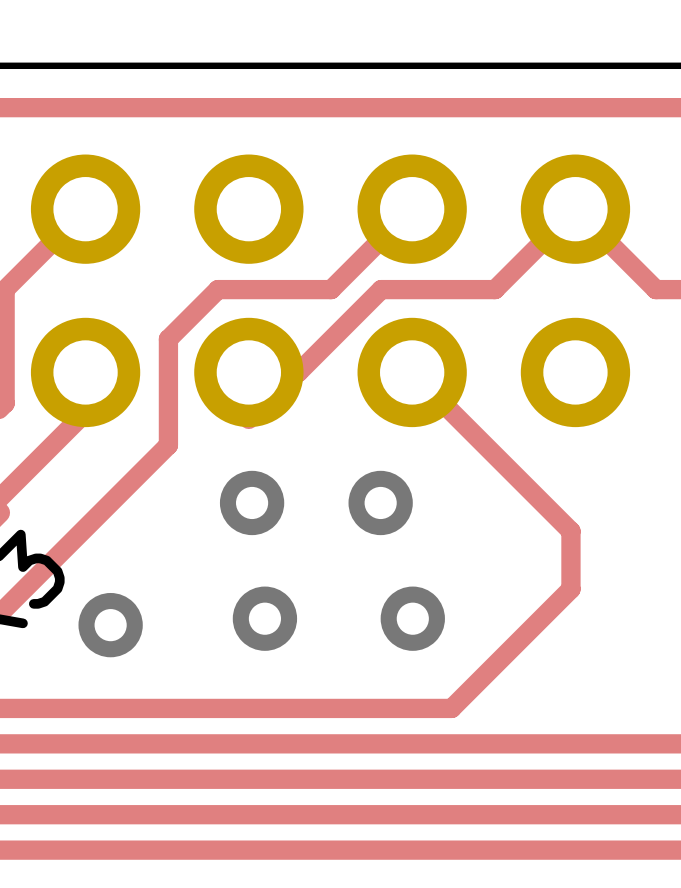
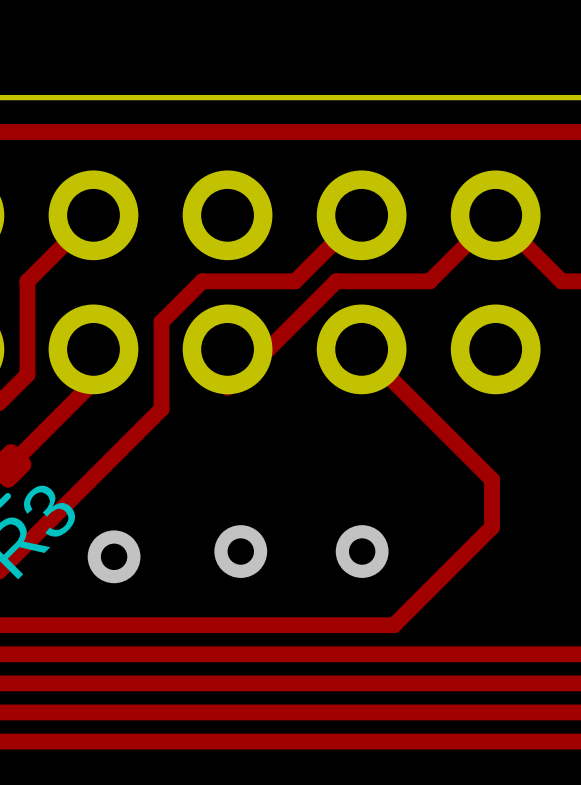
via: (252, 502) -> none
via: (380, 502) -> none

